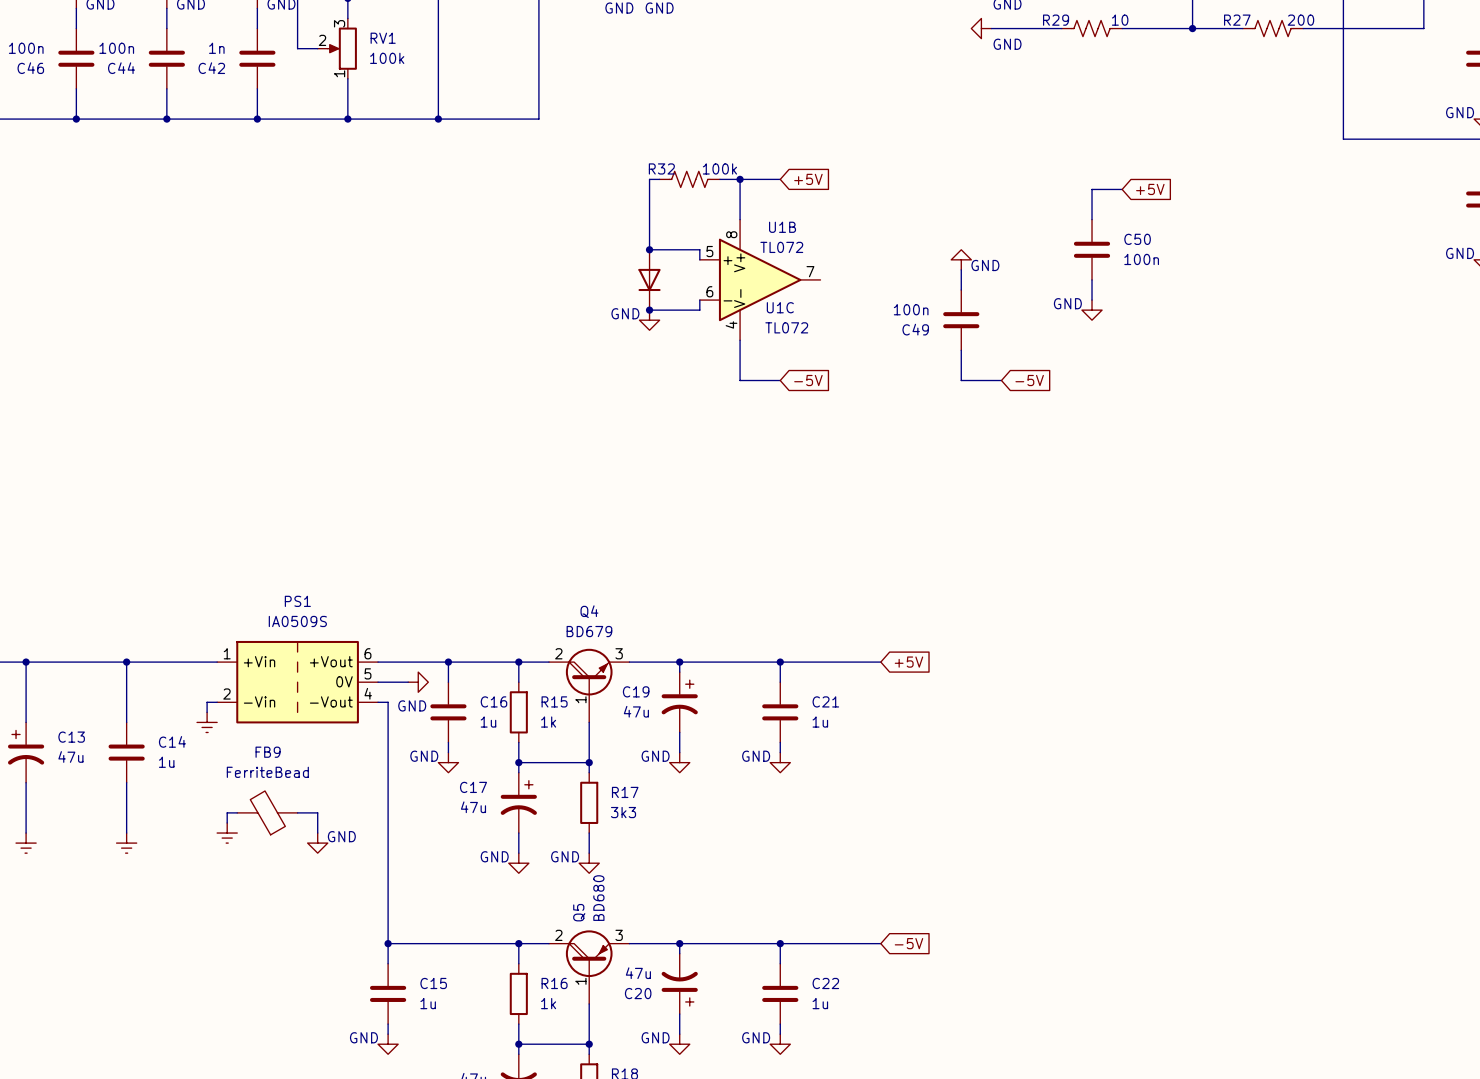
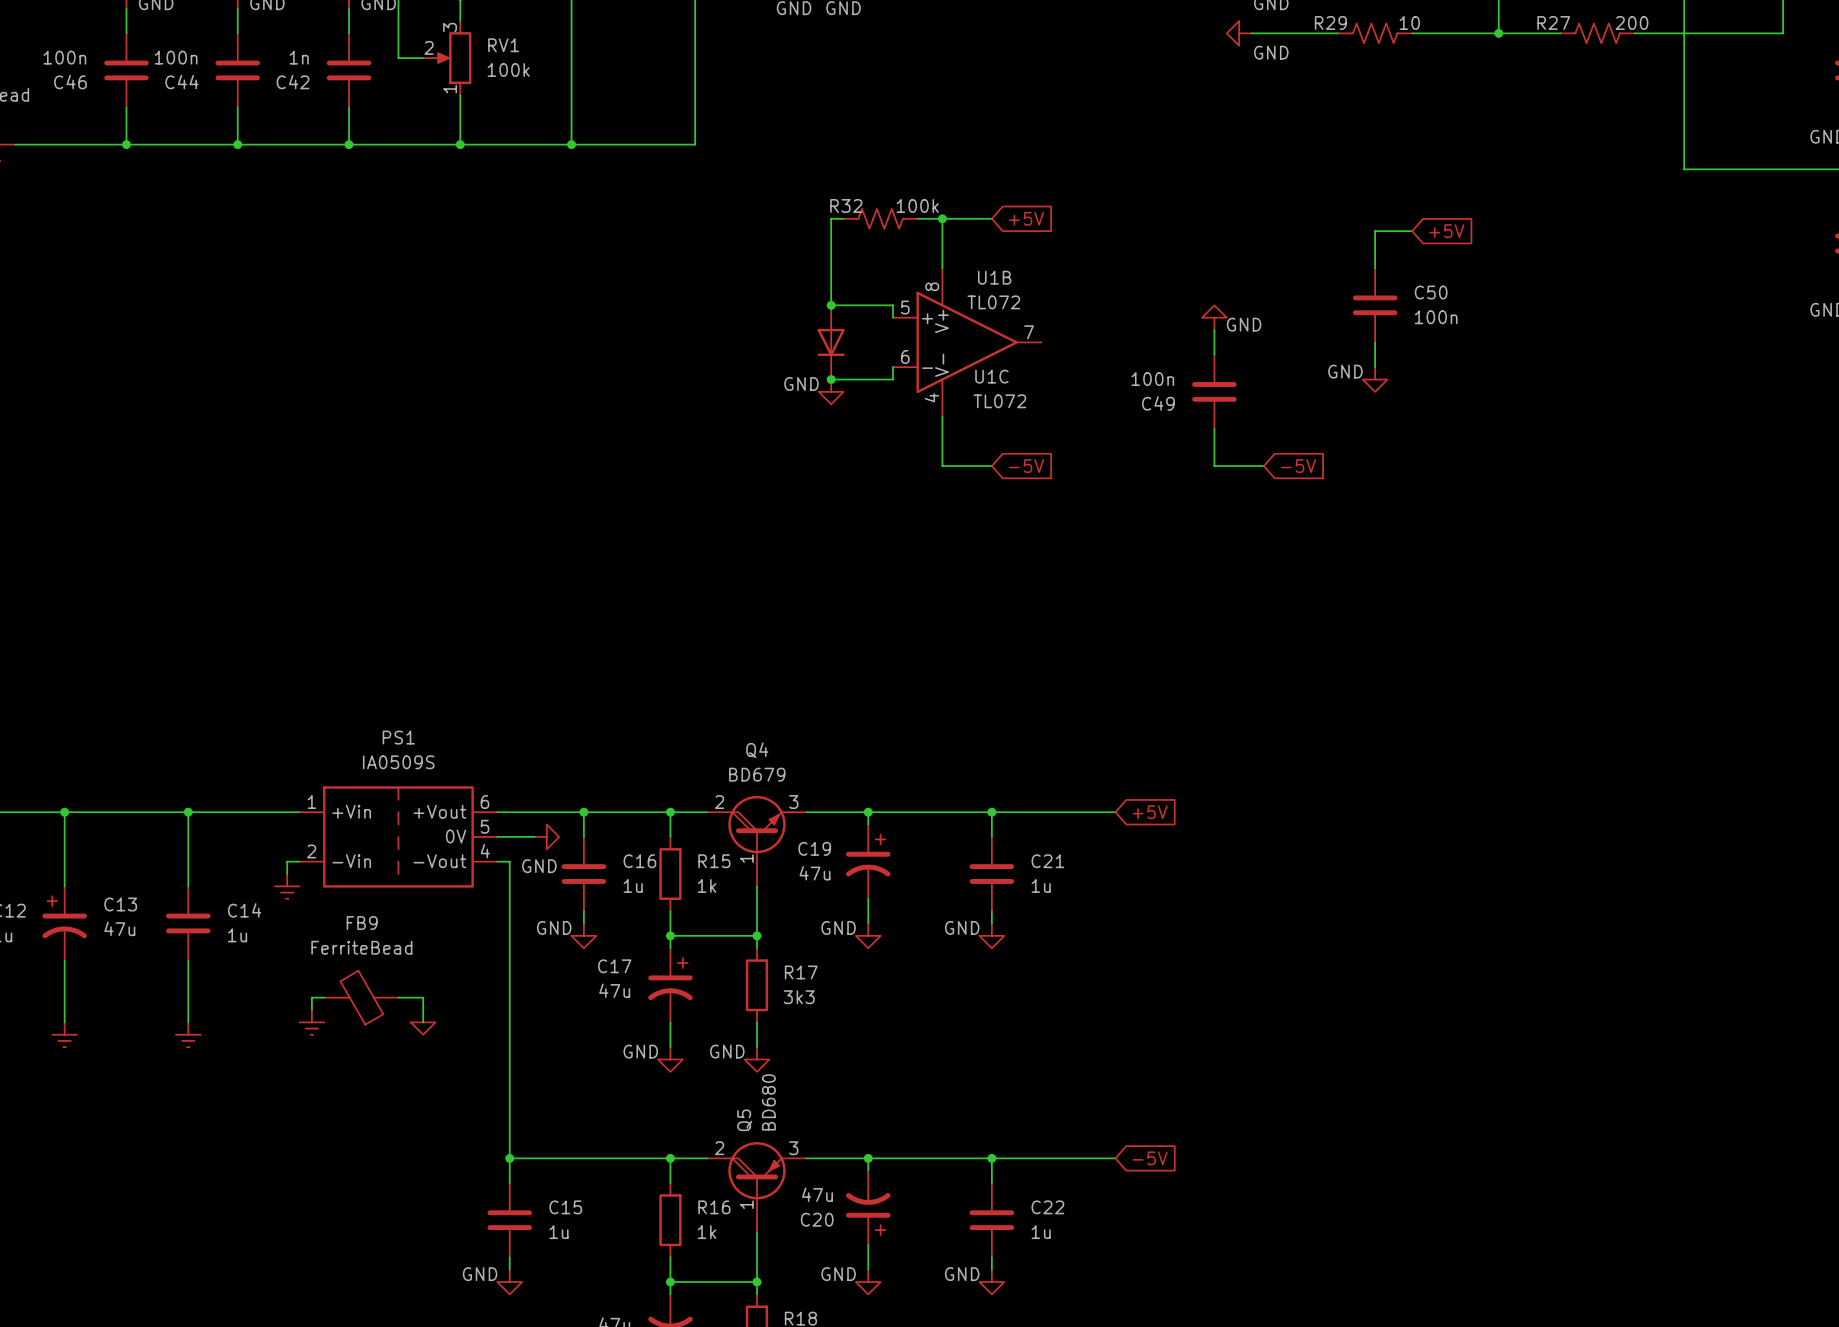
power symbol shape: [307, 833, 328, 854] -> [410, 1022, 436, 1035]
power symbol text: GND (341, 836) -> none

